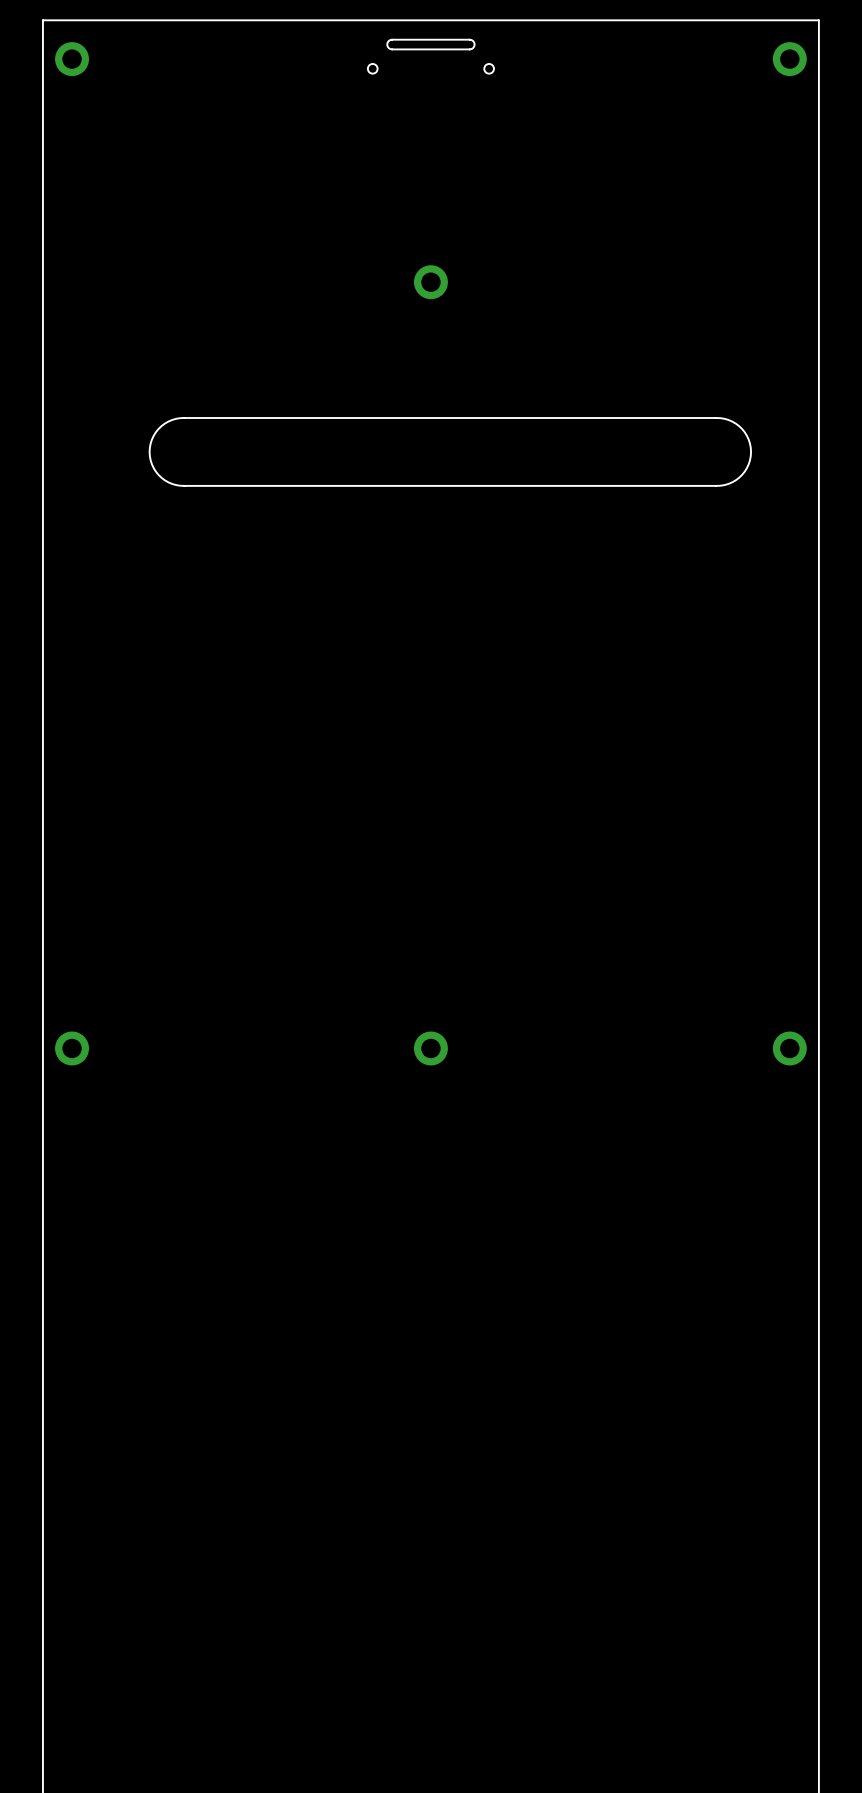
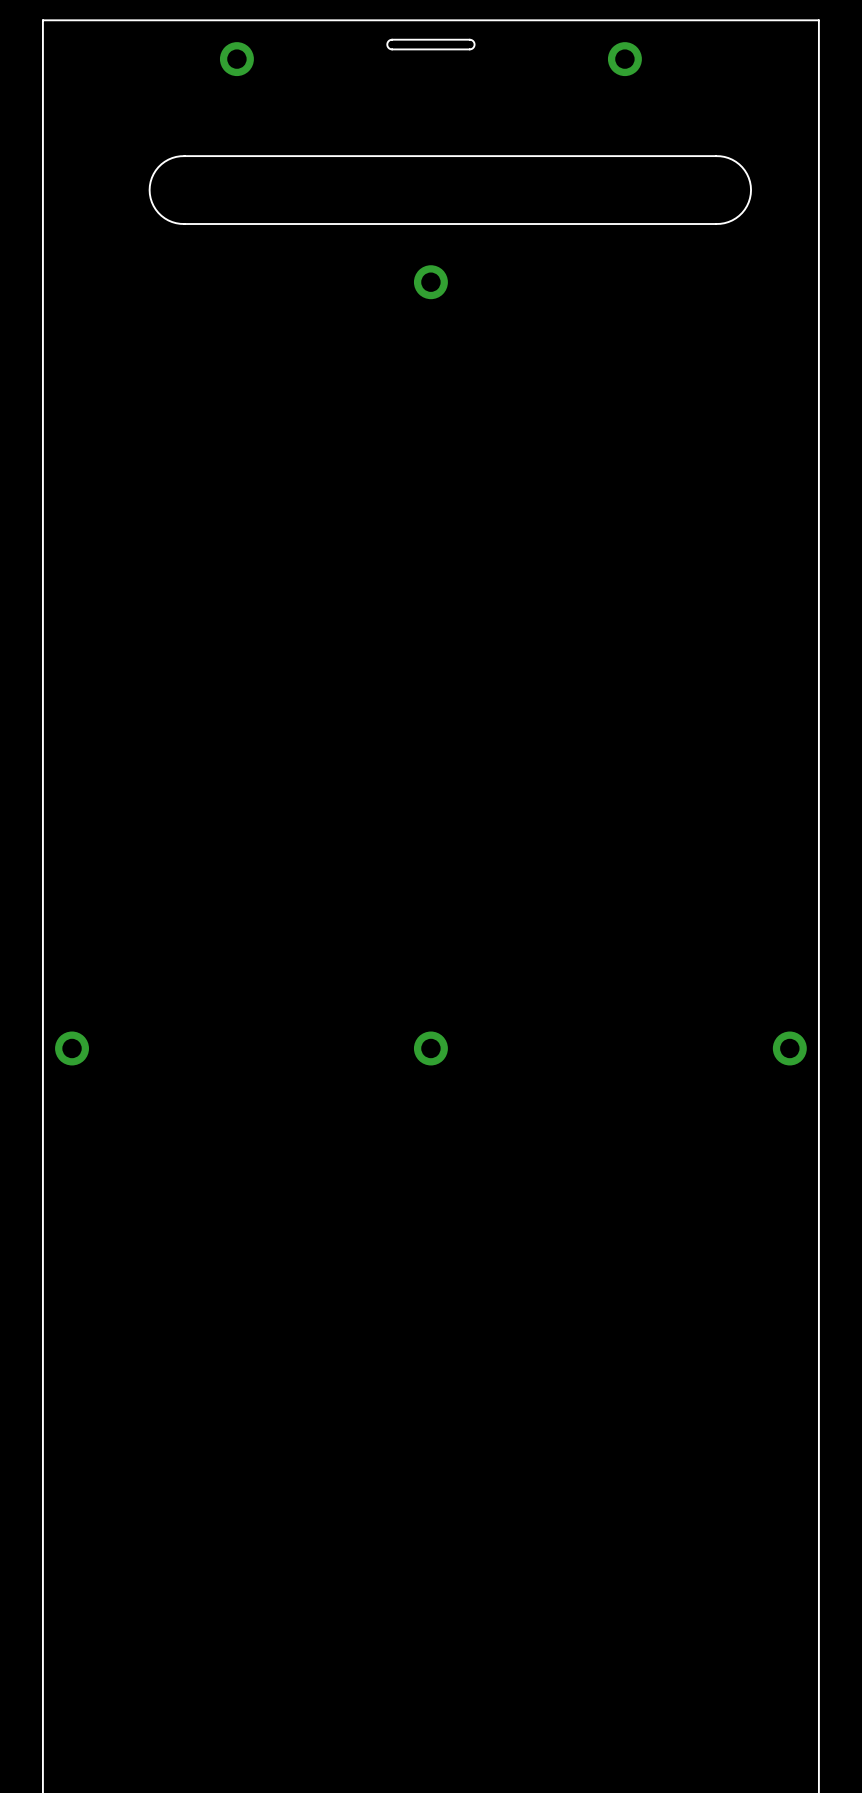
part position: (72, 59) -> (236, 59)
part position: (789, 59) -> (624, 59)
part: (372, 68) -> none
part: (489, 68) -> none
board edge: none -> (716, 156) (180, 156) (168, 159) (155, 170) (150, 181) (149, 194) (153, 206) (161, 215) (172, 222) (180, 223) (720, 223) (732, 220) (742, 212) (750, 198) (750, 185) (747, 174) (739, 164) (728, 158) (716, 156)
board edge: (716, 418) (180, 418) (168, 421) (158, 429) (150, 443) (149, 456) (153, 467) (161, 477) (172, 483) (180, 485) (720, 485) (732, 482) (742, 474) (750, 460) (750, 447) (747, 435) (739, 426) (728, 419) (716, 418) -> none

